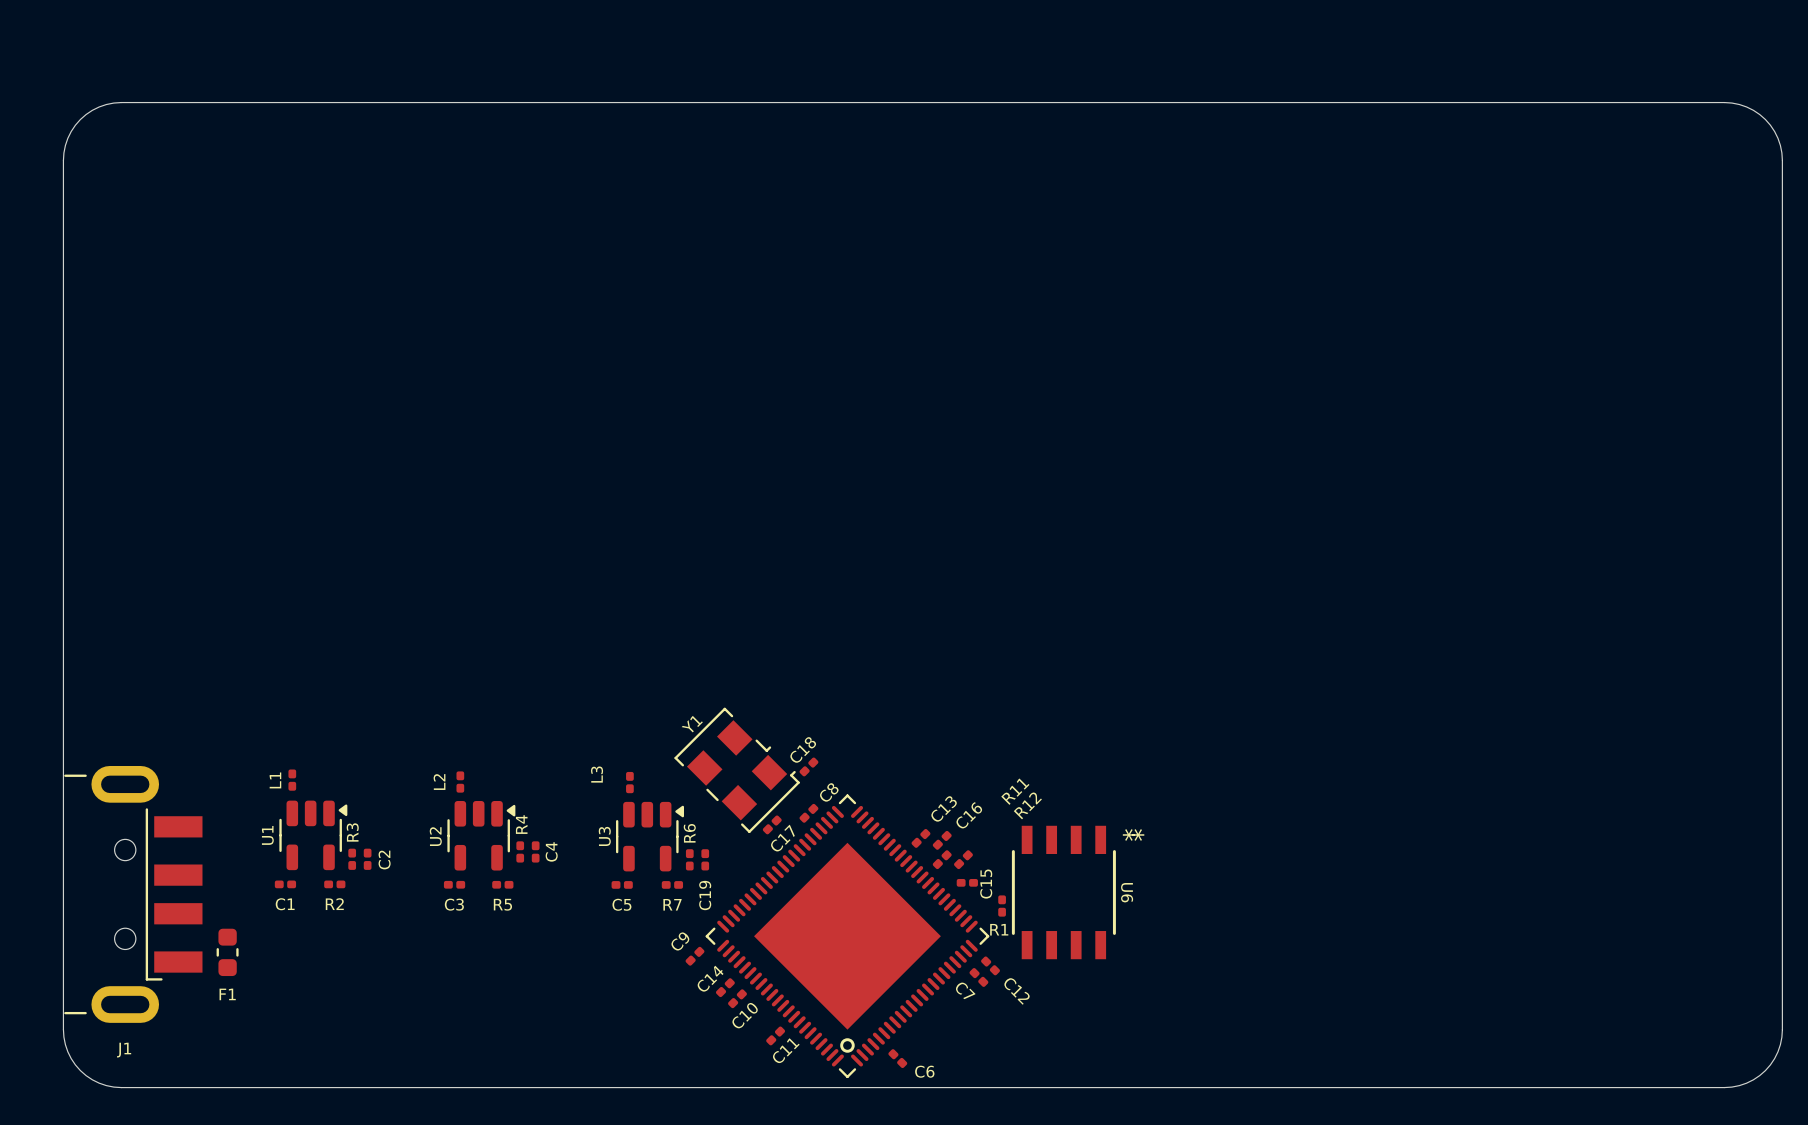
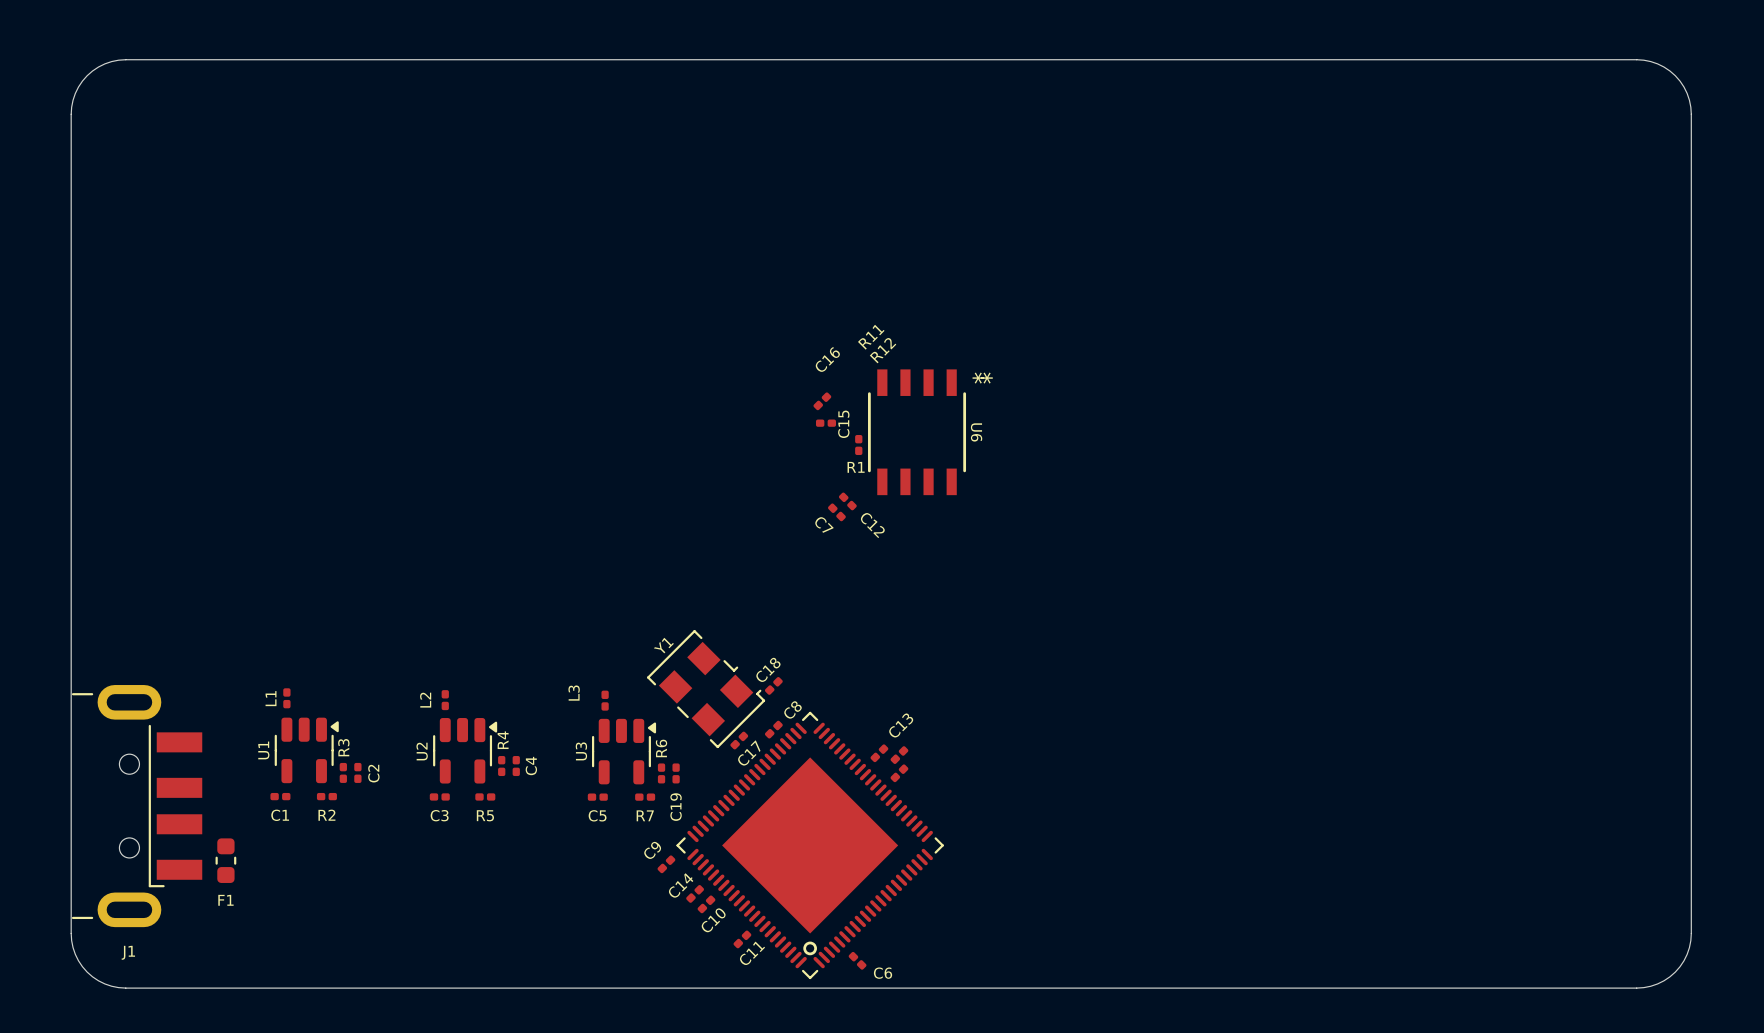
R11 name position: R11 (1015, 791) -> R11 (871, 337)
C16 name position: C16 (969, 815) -> C16 (827, 359)
R12 position: (963, 859) -> (822, 401)
C15 position: (967, 882) -> (826, 423)
U6 position: (1063, 892) -> (917, 432)
R1 position: (1002, 906) -> (858, 445)
C12 position: (990, 965) -> (847, 501)
C7 position: (978, 977) -> (836, 512)

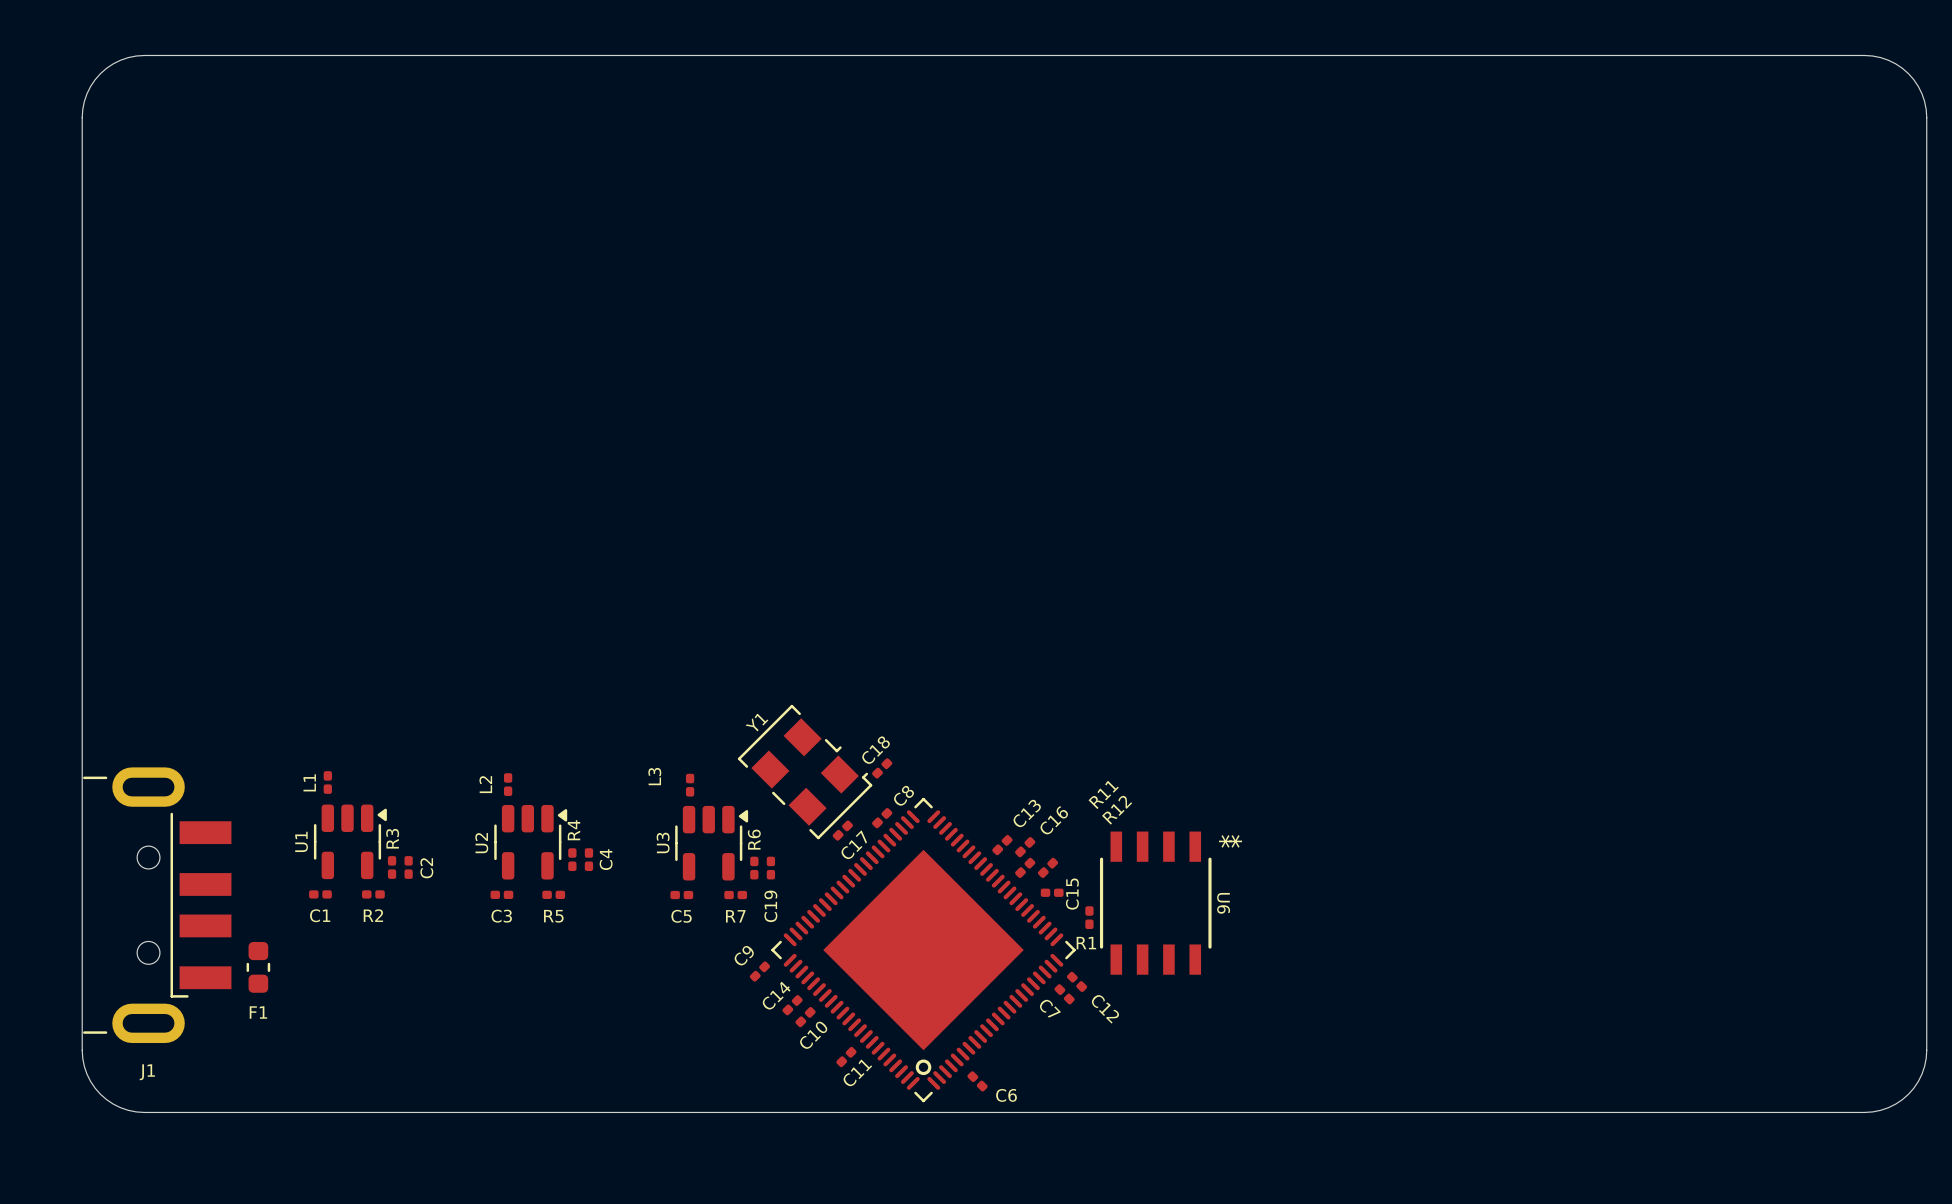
R11 name position: R11 (871, 337) -> R11 (1103, 794)
C16 name position: C16 (827, 359) -> C16 (1054, 820)
R12 position: (822, 401) -> (1048, 867)
C15 position: (826, 423) -> (1052, 892)
U6 position: (917, 432) -> (1155, 903)
R1 position: (858, 445) -> (1089, 917)
C12 position: (847, 501) -> (1077, 981)
C7 position: (836, 512) -> (1064, 994)

